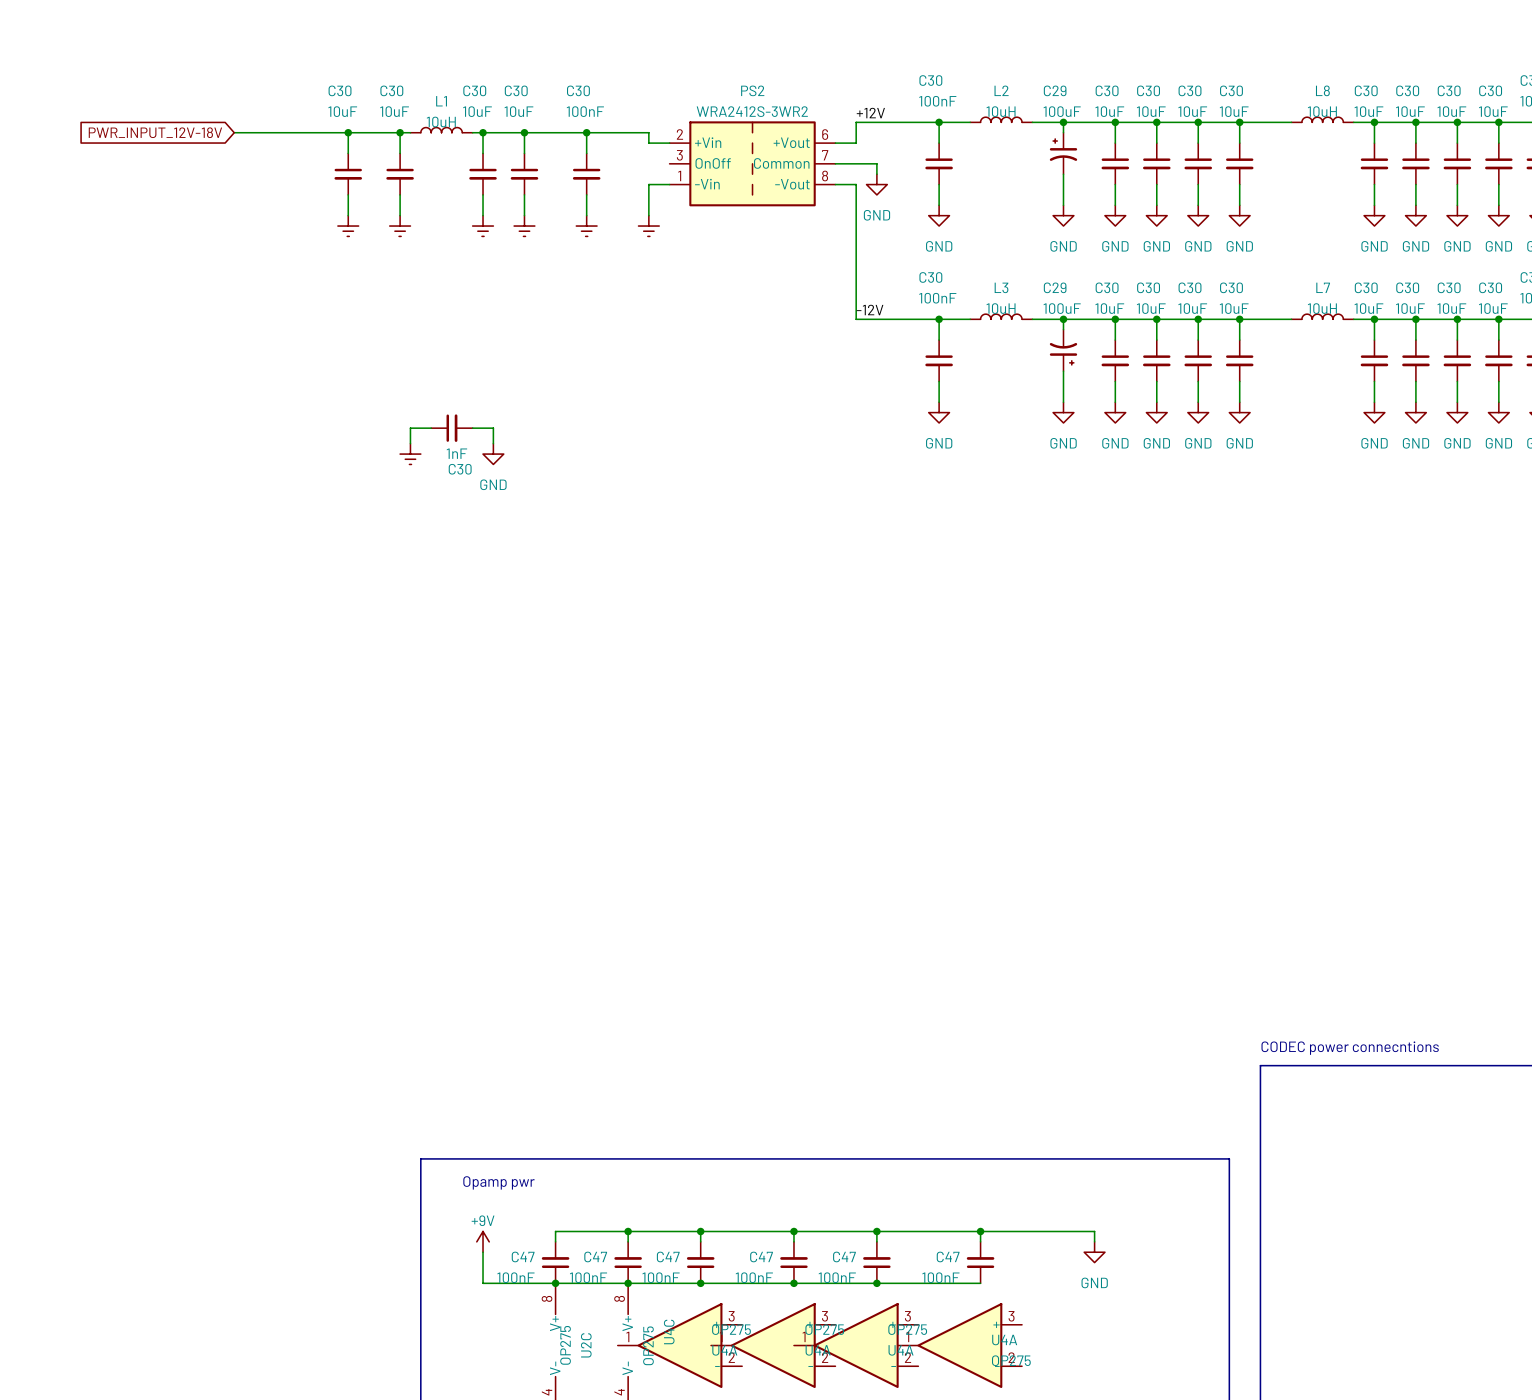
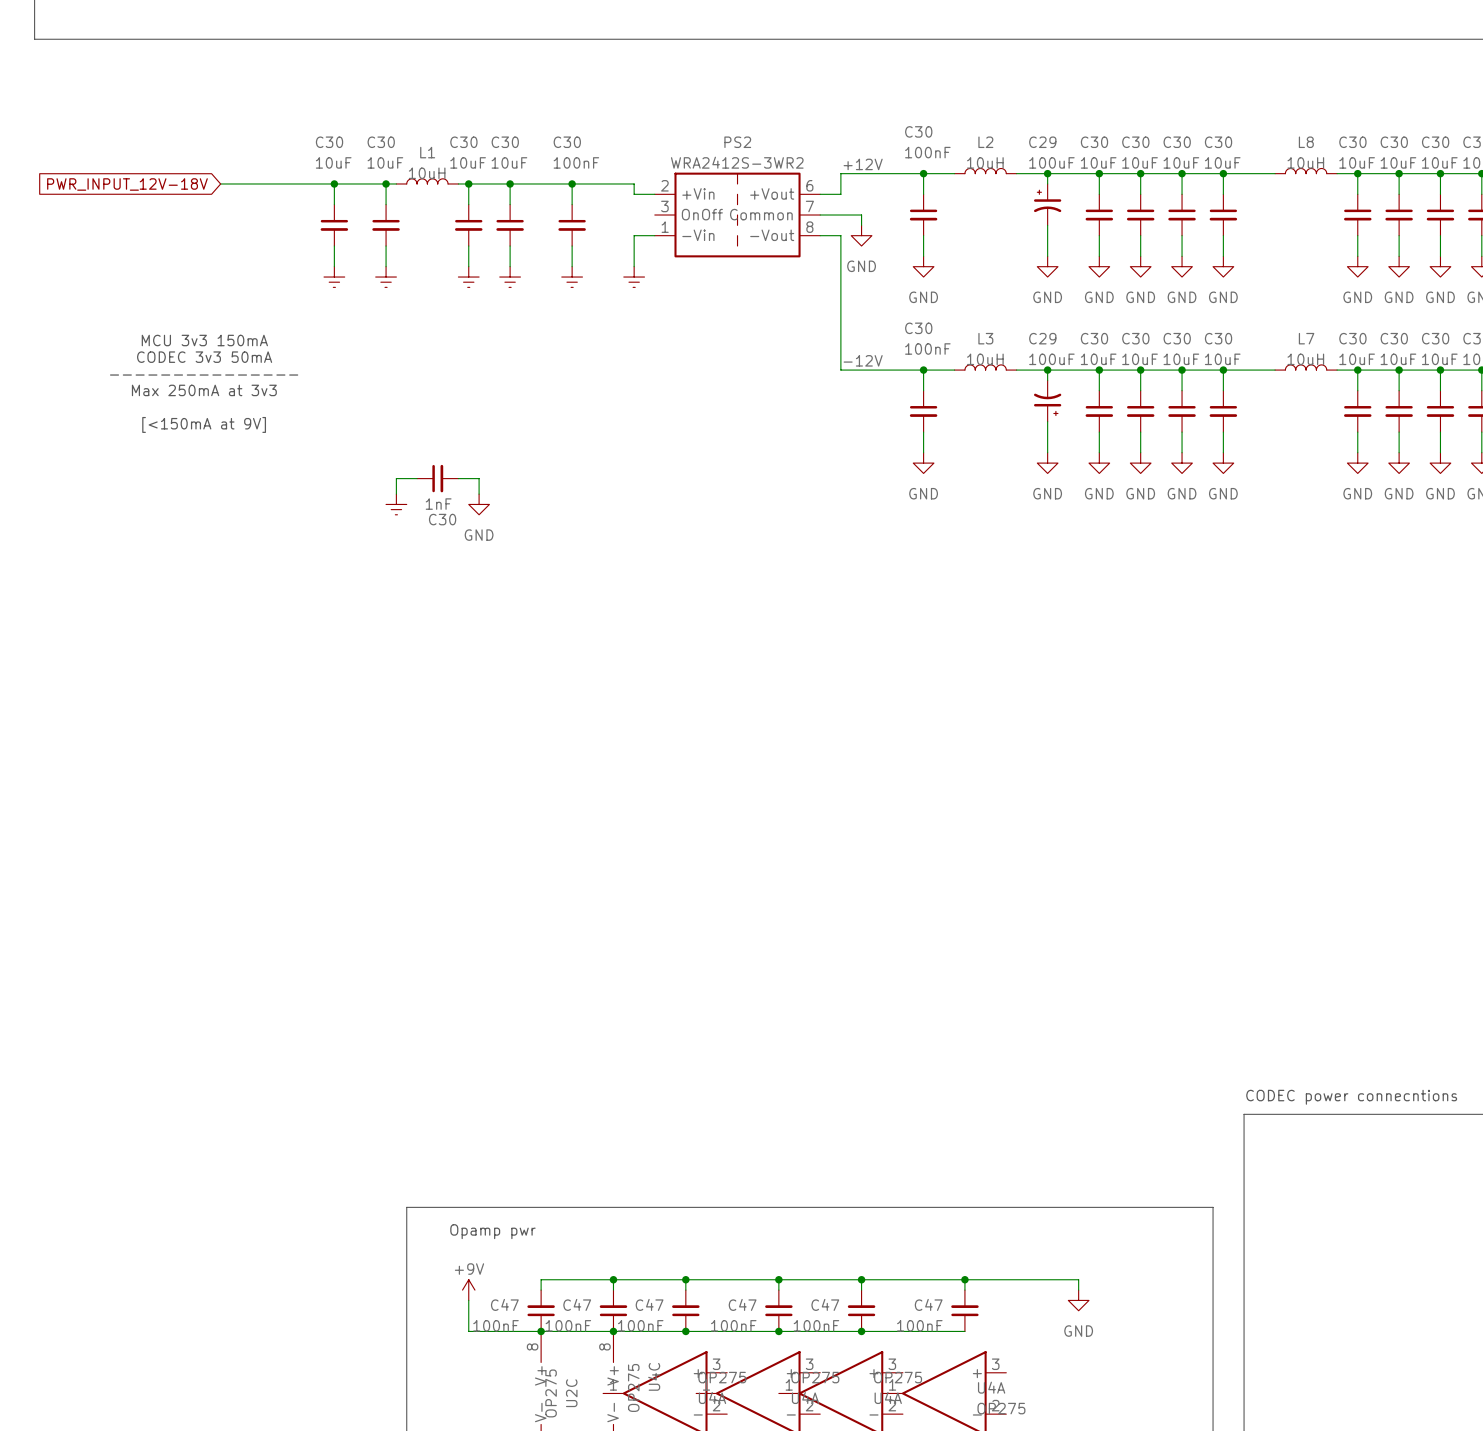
text: none -> MCU 3v3 150mA (204, 340)
text: none -> CODEC 3v3 50mA (204, 357)
text: none -> --------------- (204, 375)
text: none -> Max 250mA at 3v3 (204, 390)
text: none -> [<150mA at 9V] (204, 424)

